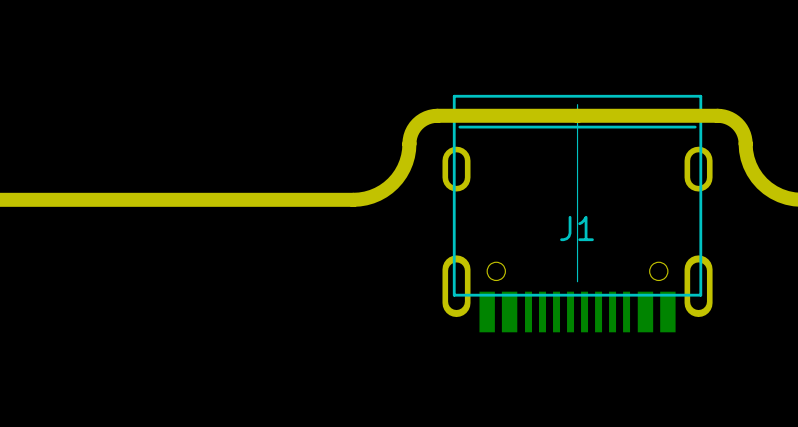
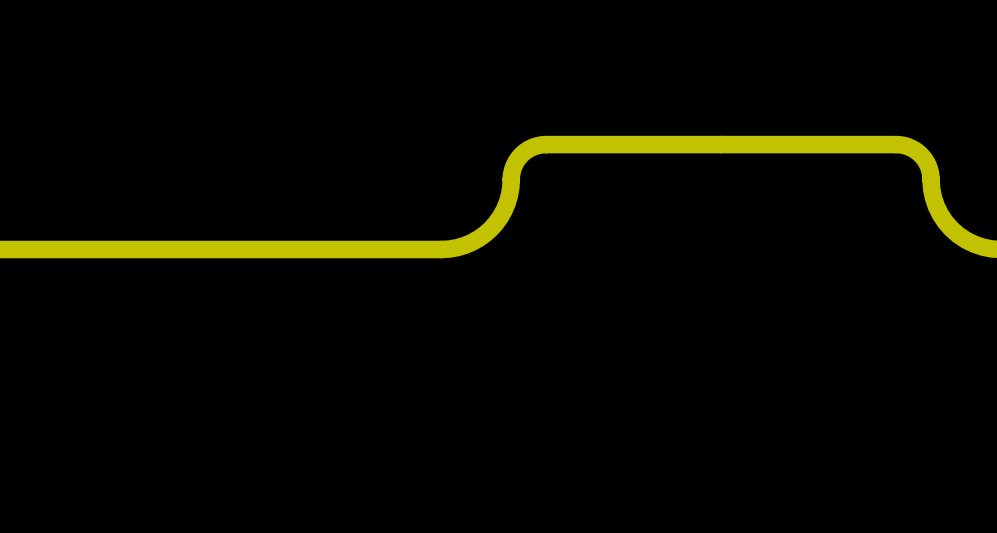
J1: (577, 213) -> none

